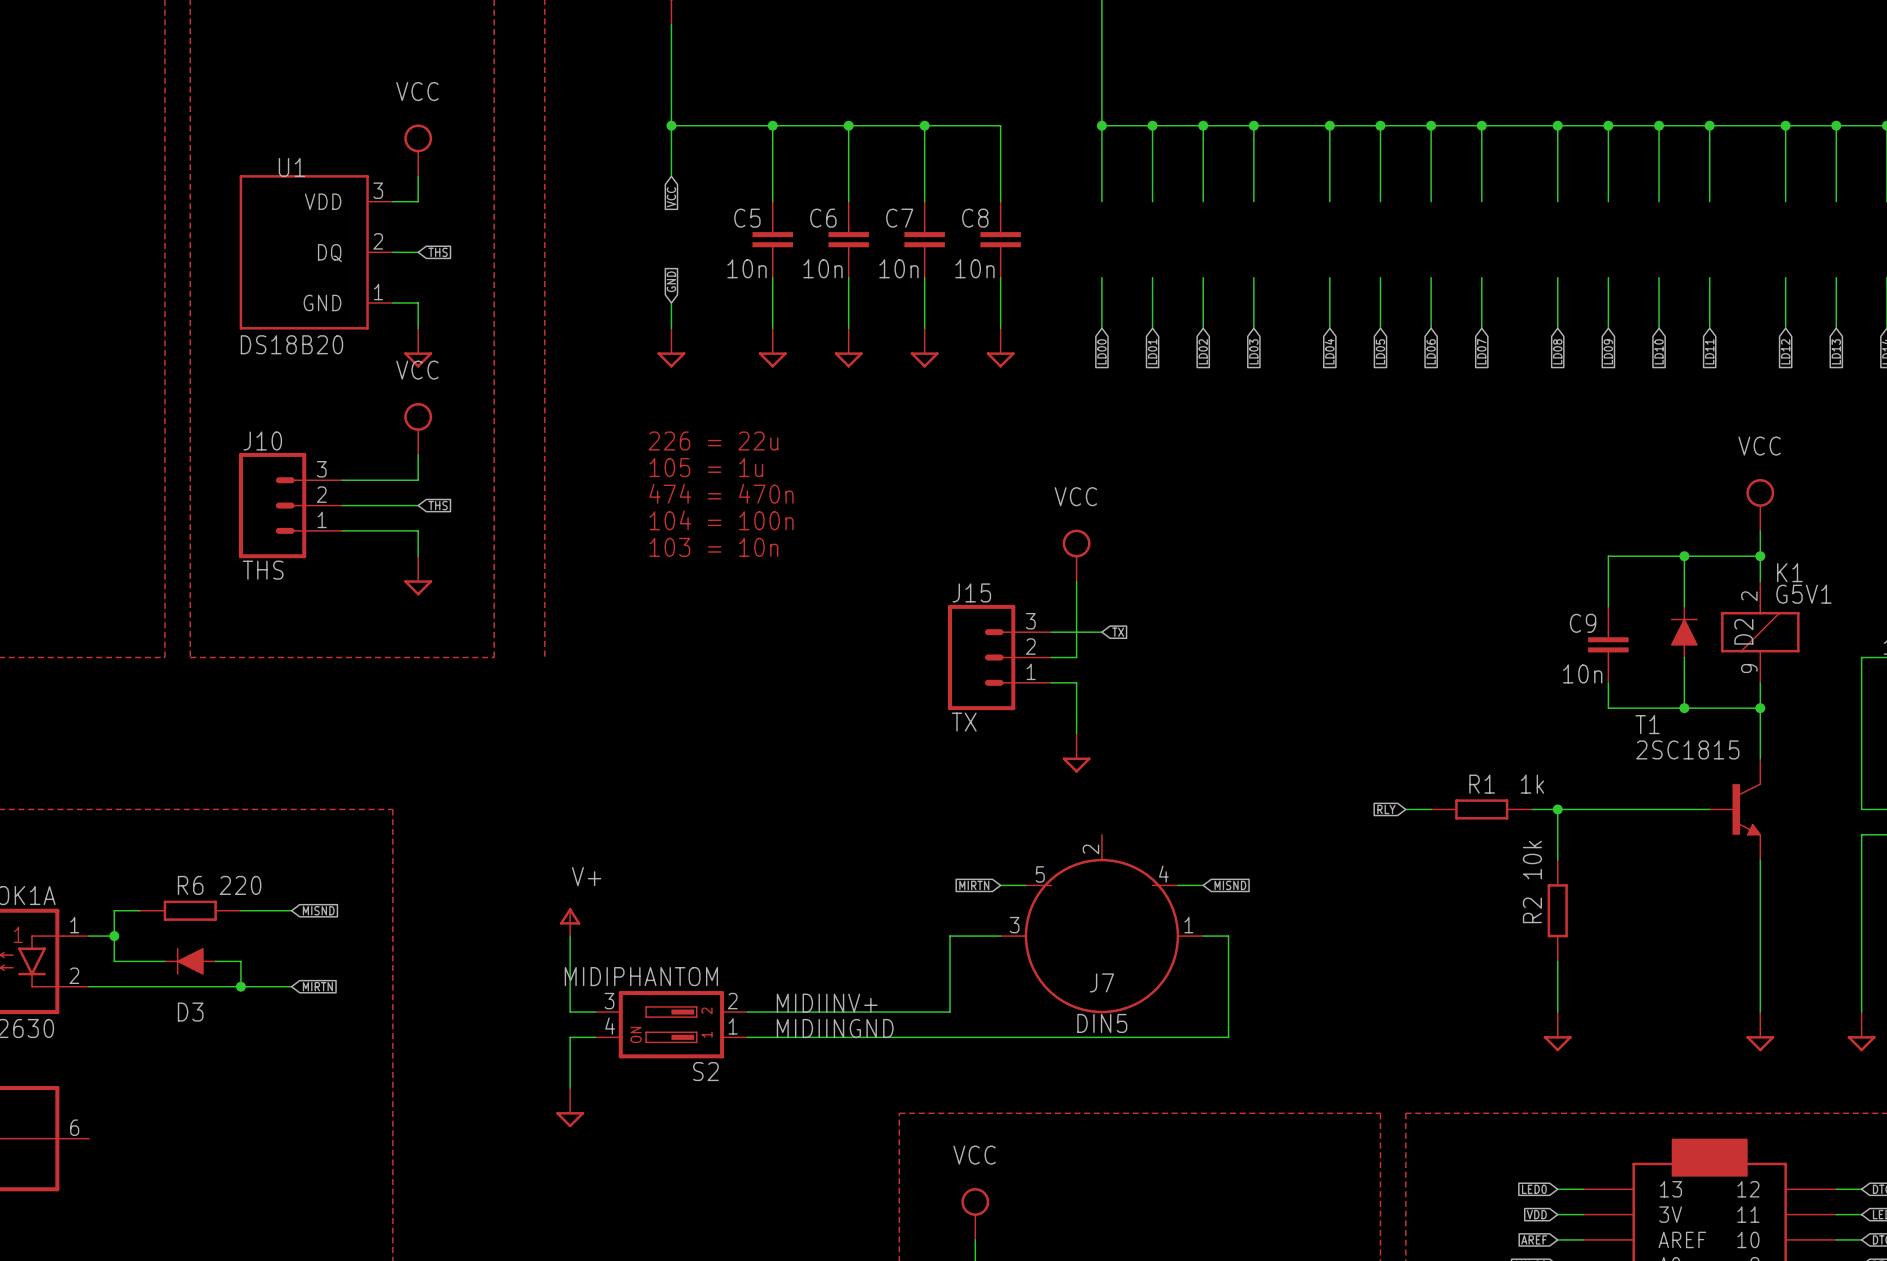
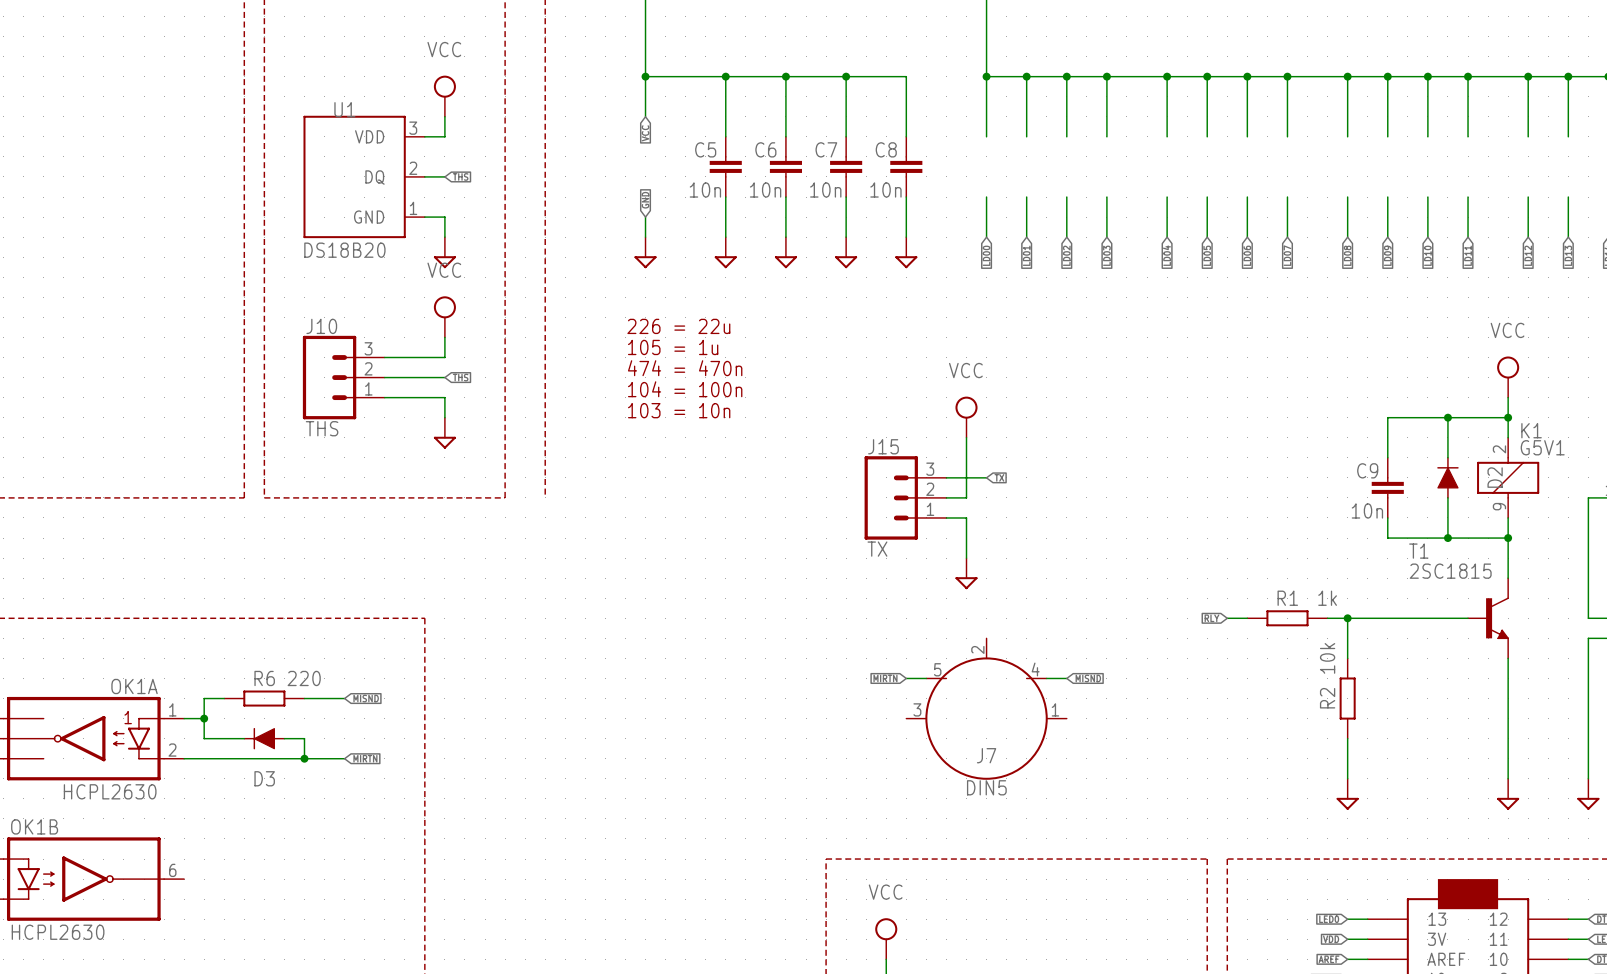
power symbol: V+ (570, 922) -> none
wire: (570, 936) (570, 1012) (595, 1012) -> none
wire: (1000, 936) (949, 936) (949, 1012) (747, 1012) -> none
wire: (1203, 936) (1228, 936) (1228, 1037) (747, 1037) -> none
label: MIDIINV+ (827, 1003) -> none
S2: MIDIPHANTOM (671, 1024) -> none
label: MIDIINGND (835, 1028) -> none
wire: (595, 1037) (570, 1037) (570, 1088) -> none
power symbol: (570, 1107) -> none

